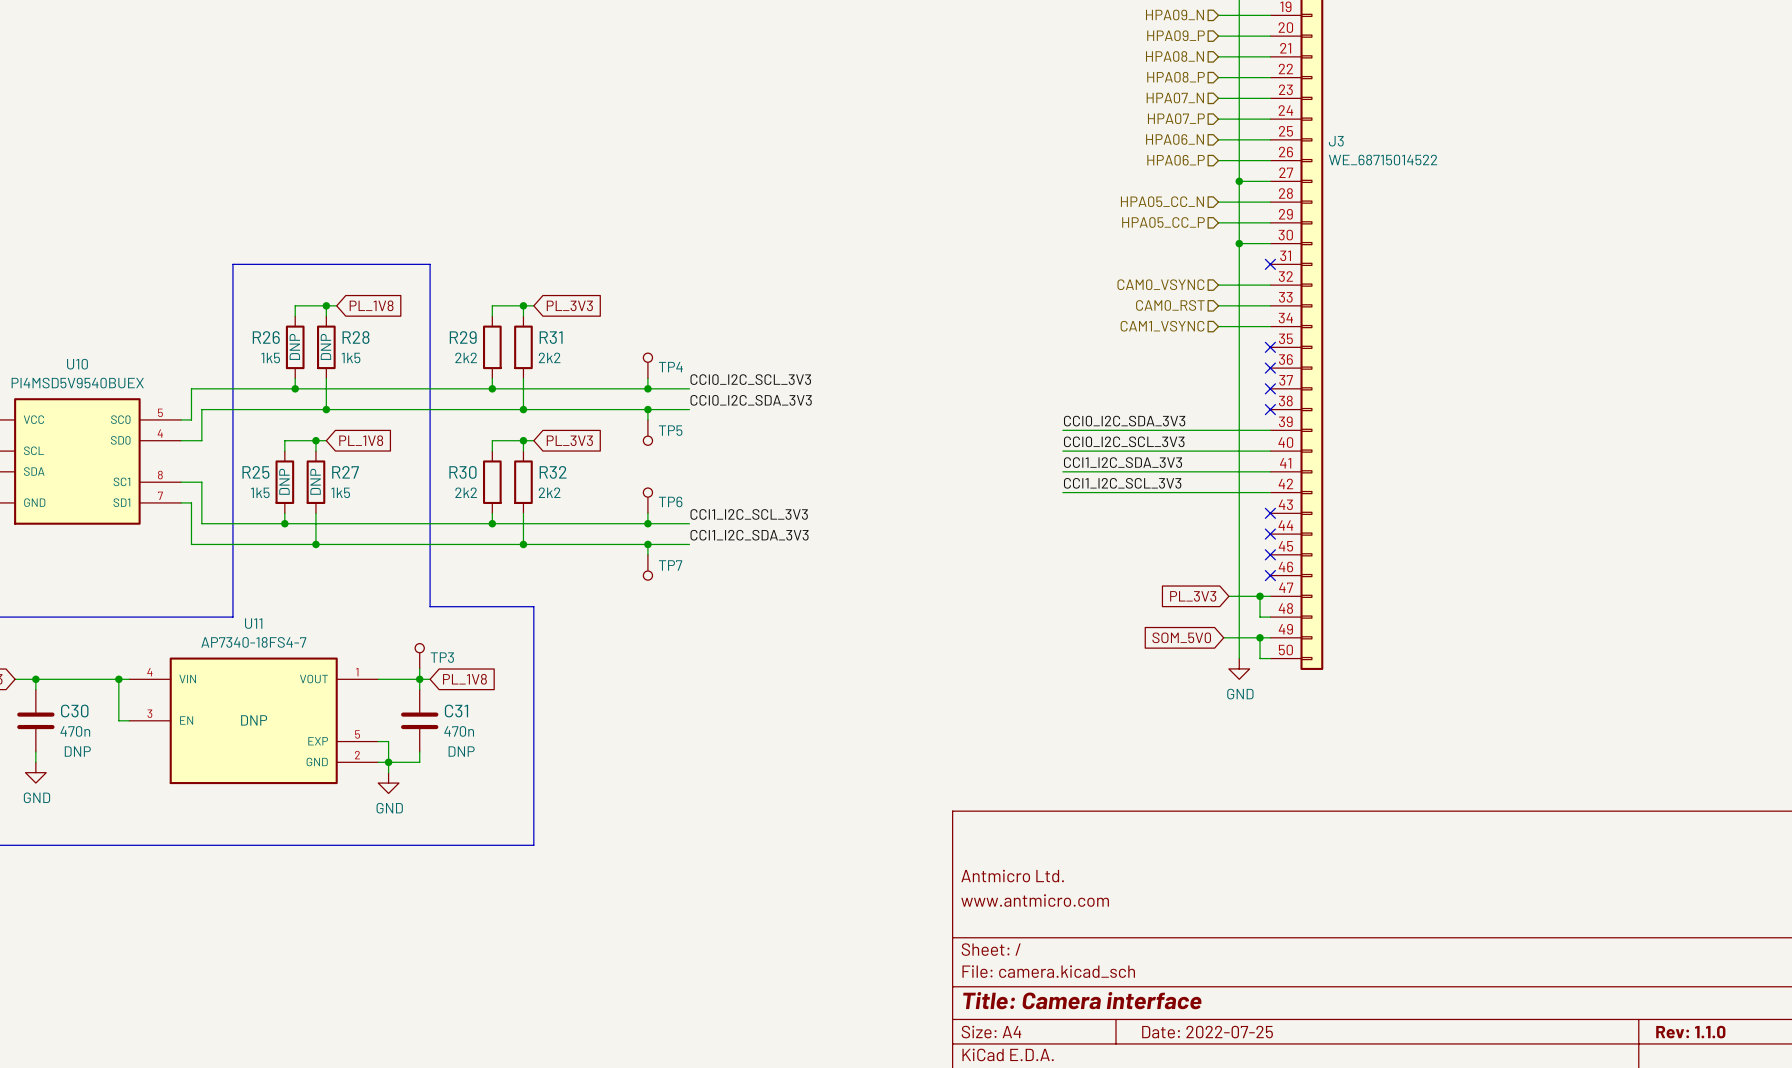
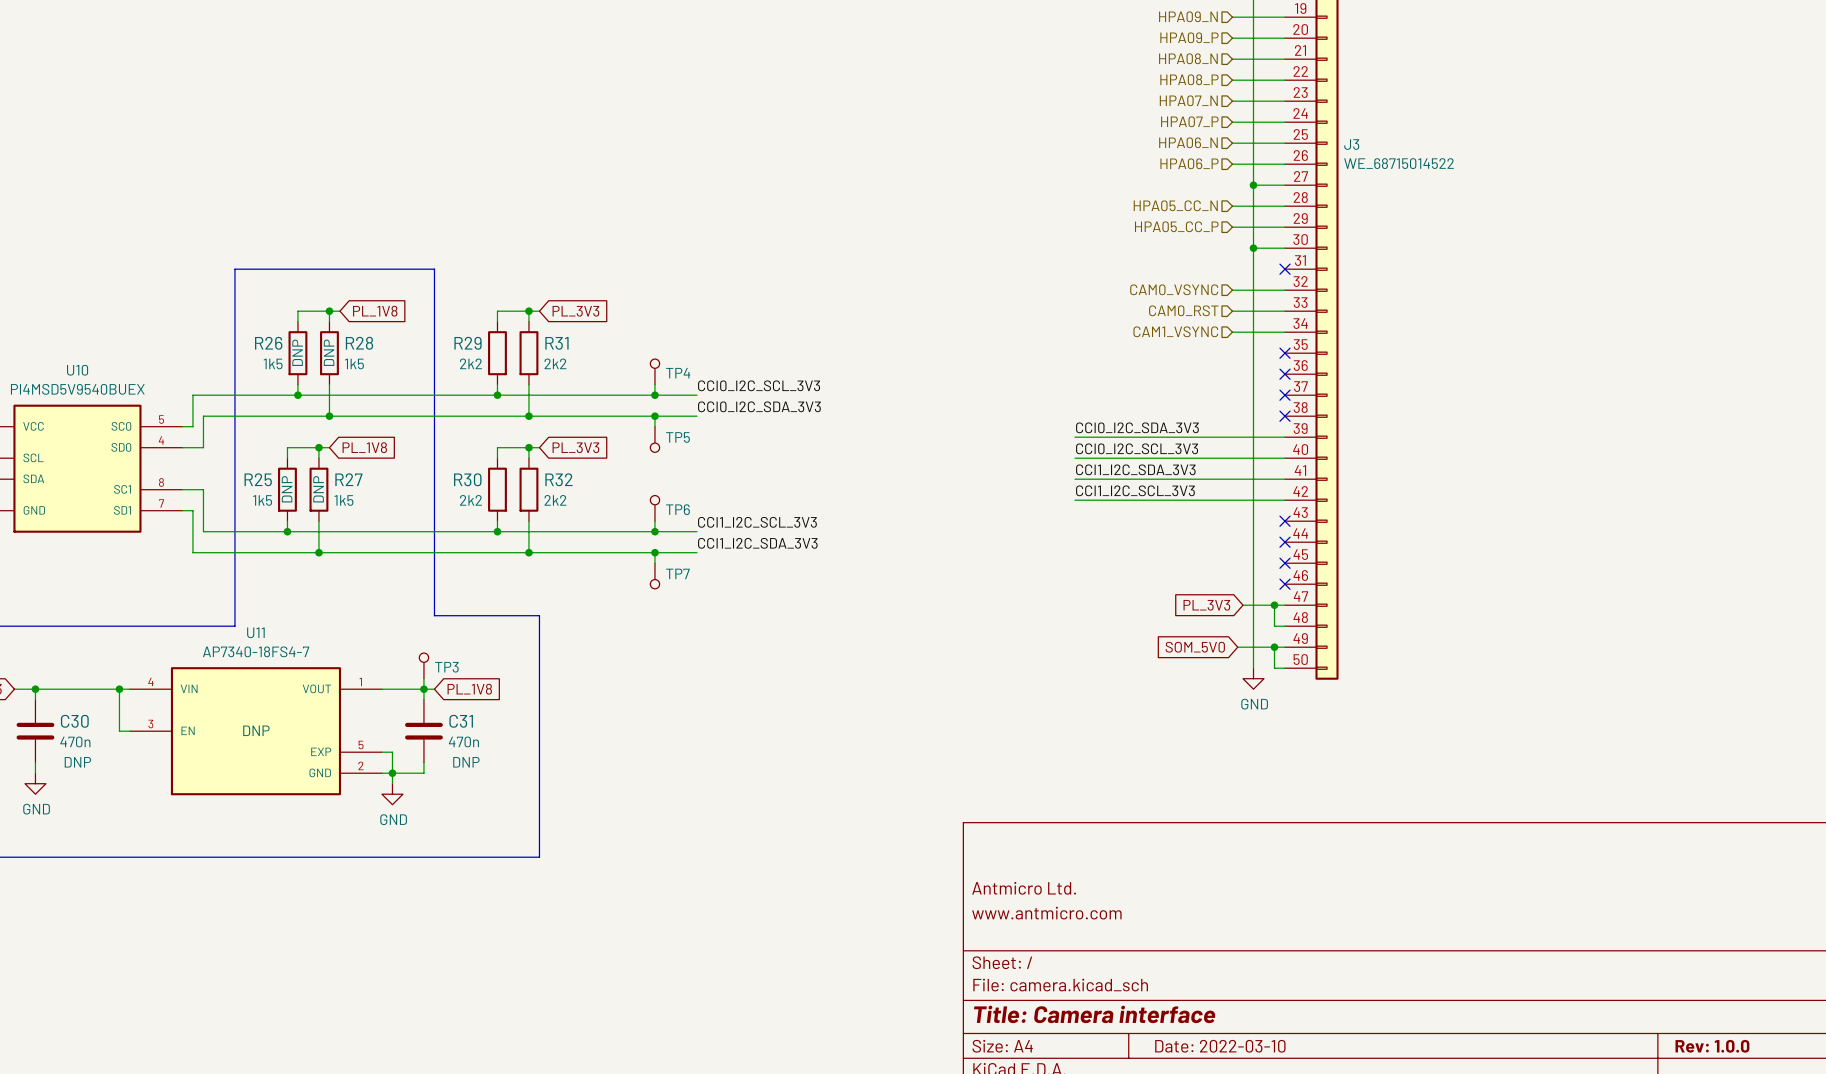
title block: Date: 2022-07-25 (1207, 1032) -> Date: 2022-03-10 (1220, 1046)
title block: Rev: 1.1.0 (1690, 1032) -> Rev: 1.0.0 (1712, 1046)

